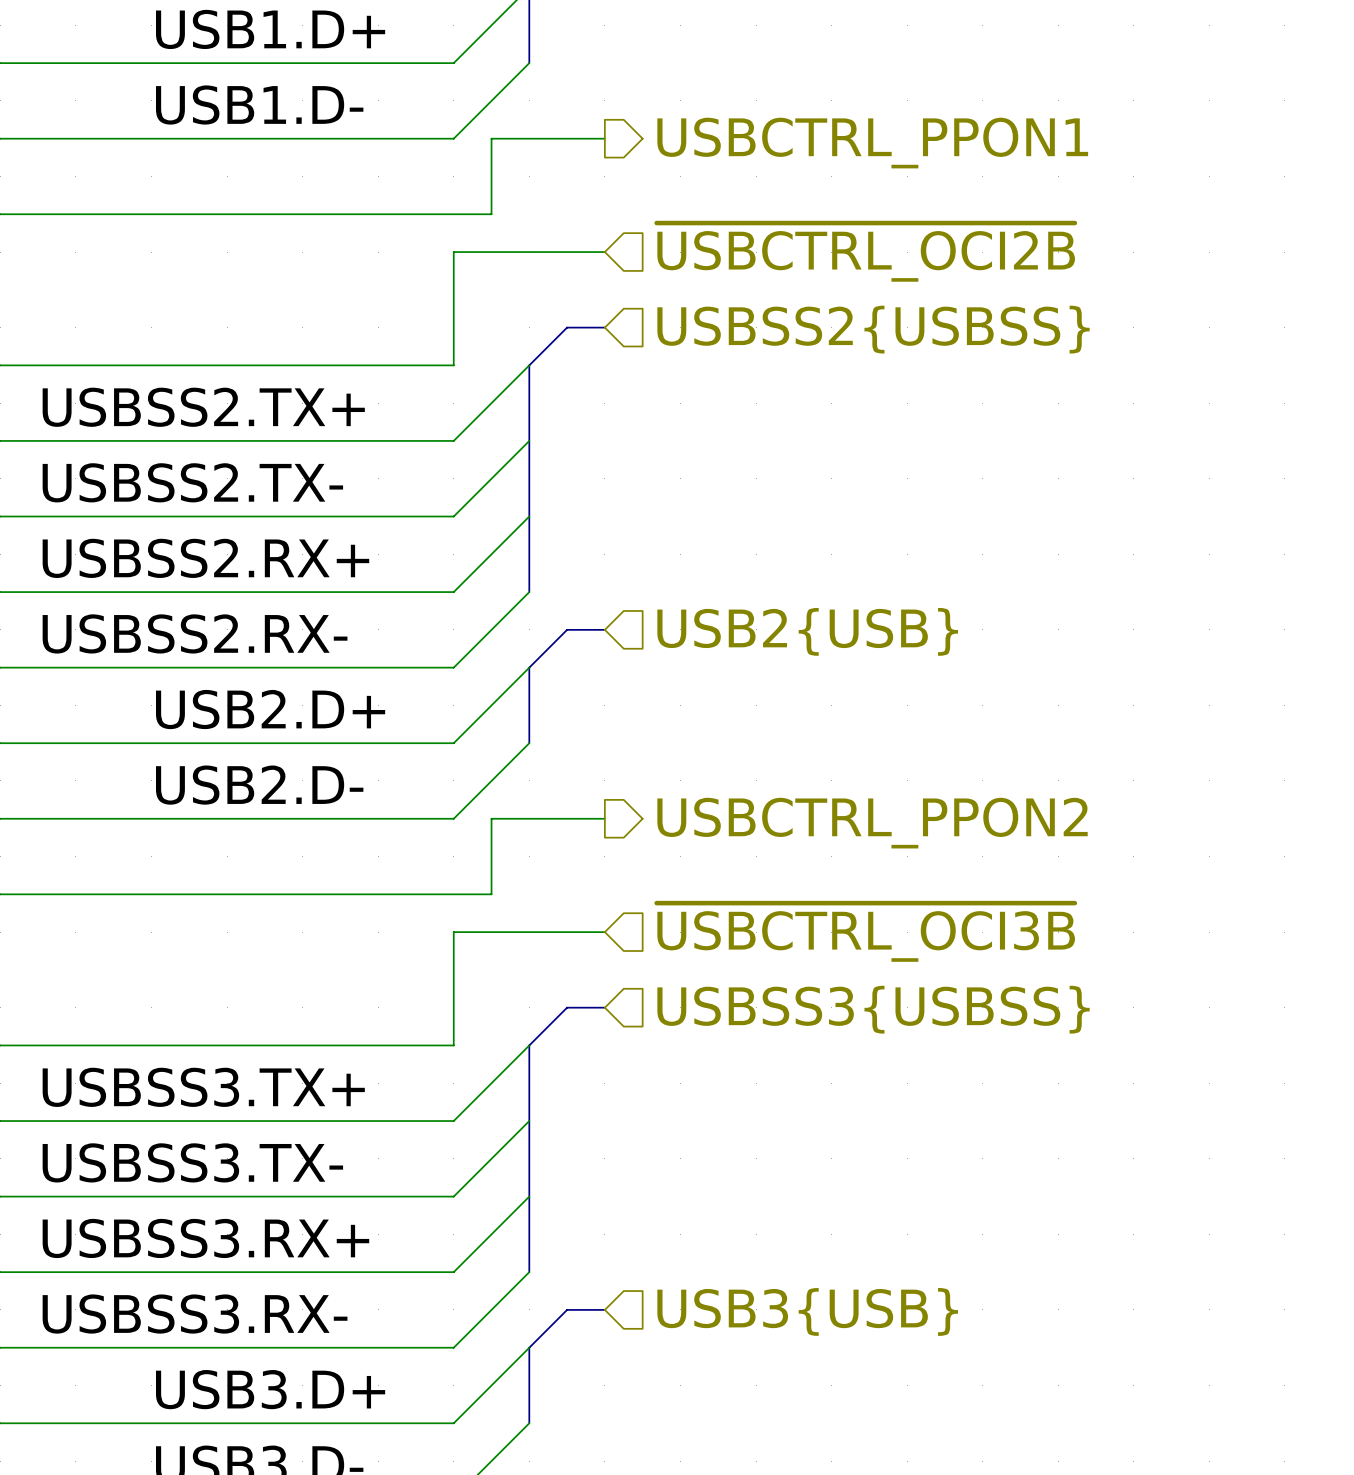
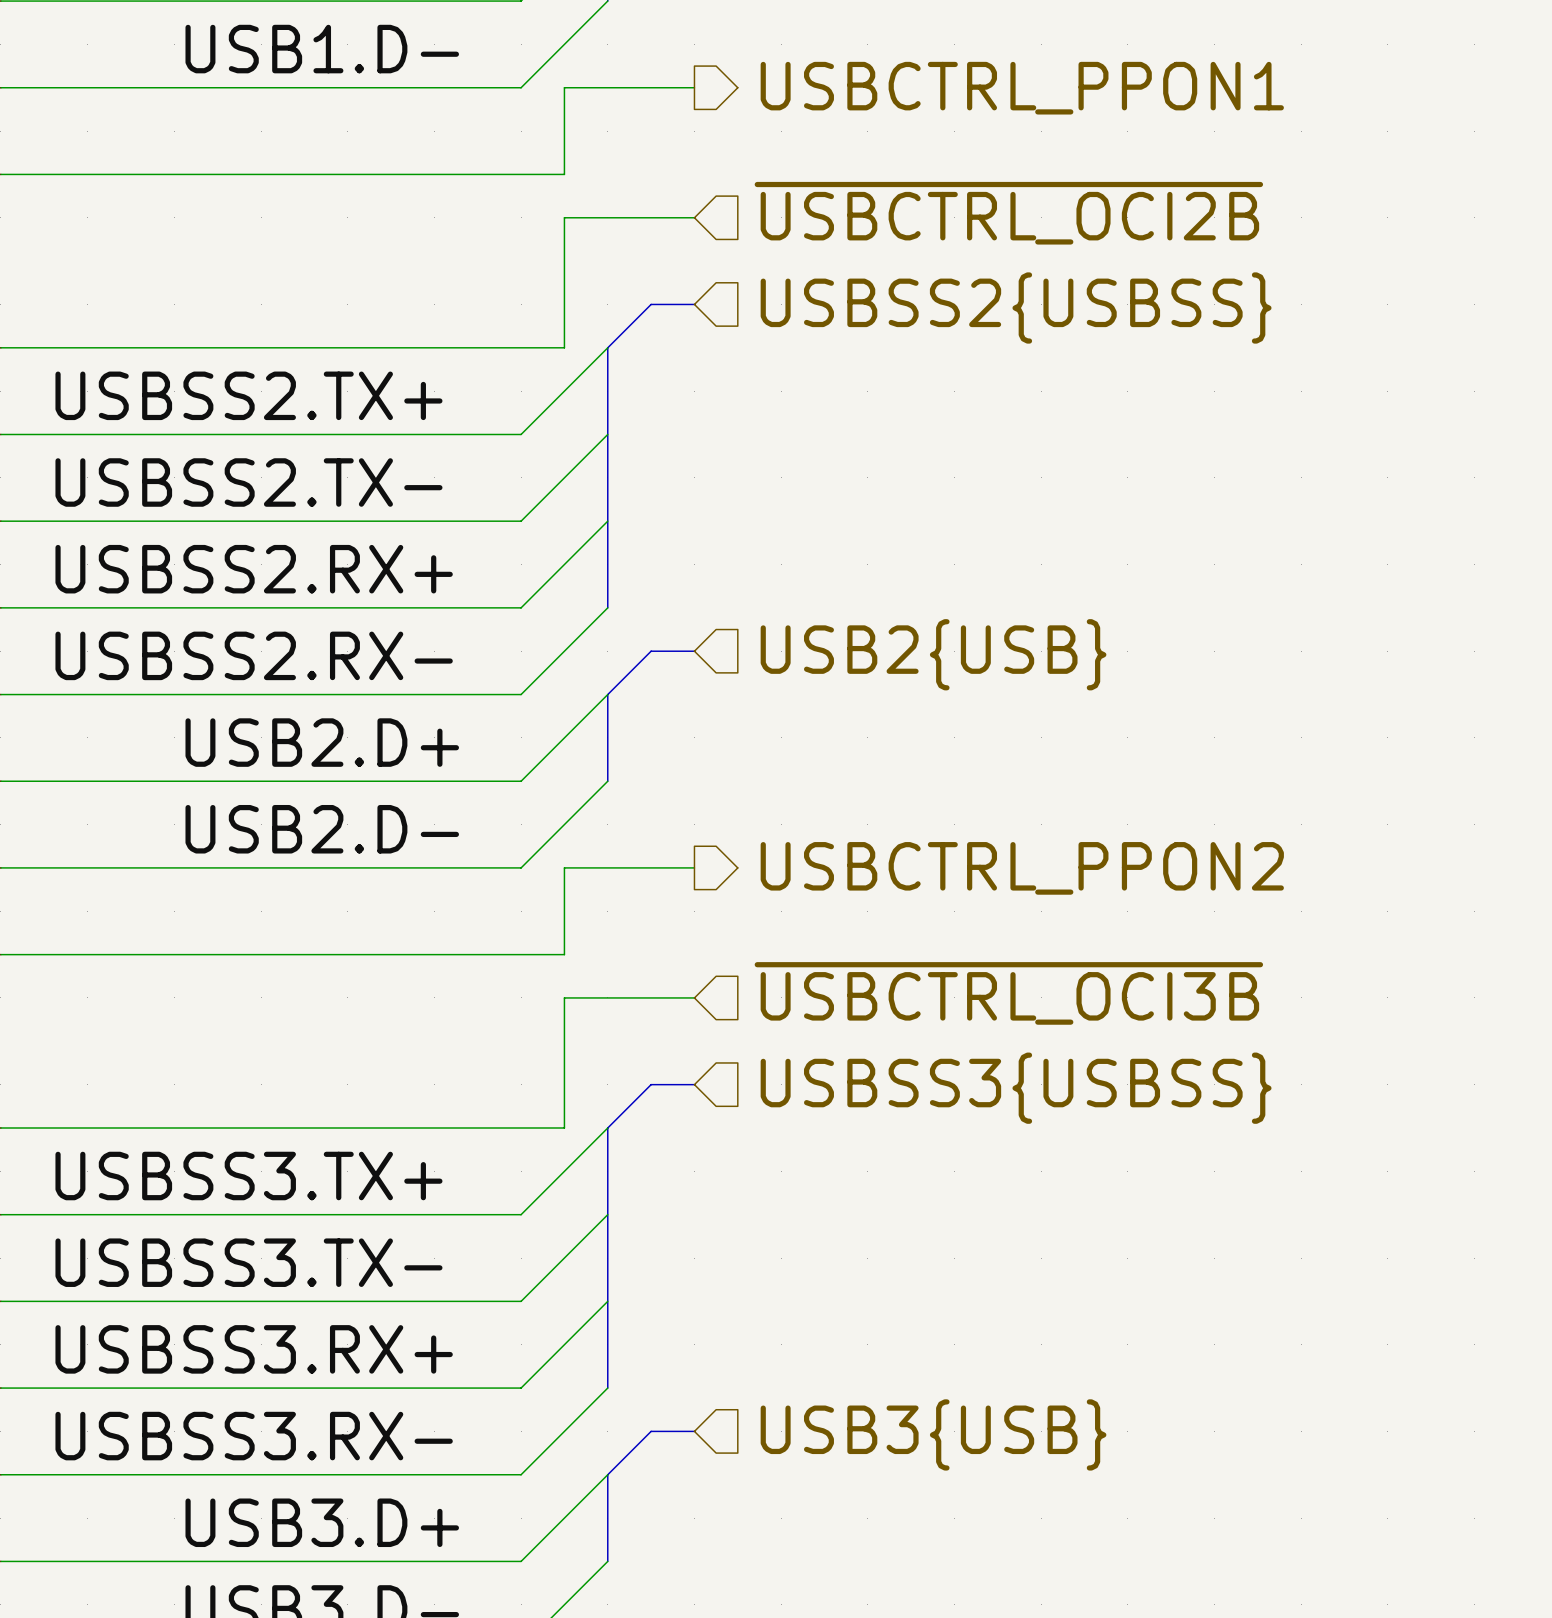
wire: (491, 252) (453, 252) (453, 365) -> (564, 217) (564, 347) (521, 347)
wire: (491, 932) (453, 932) (453, 1045) -> (564, 997) (564, 1127) (521, 1127)

